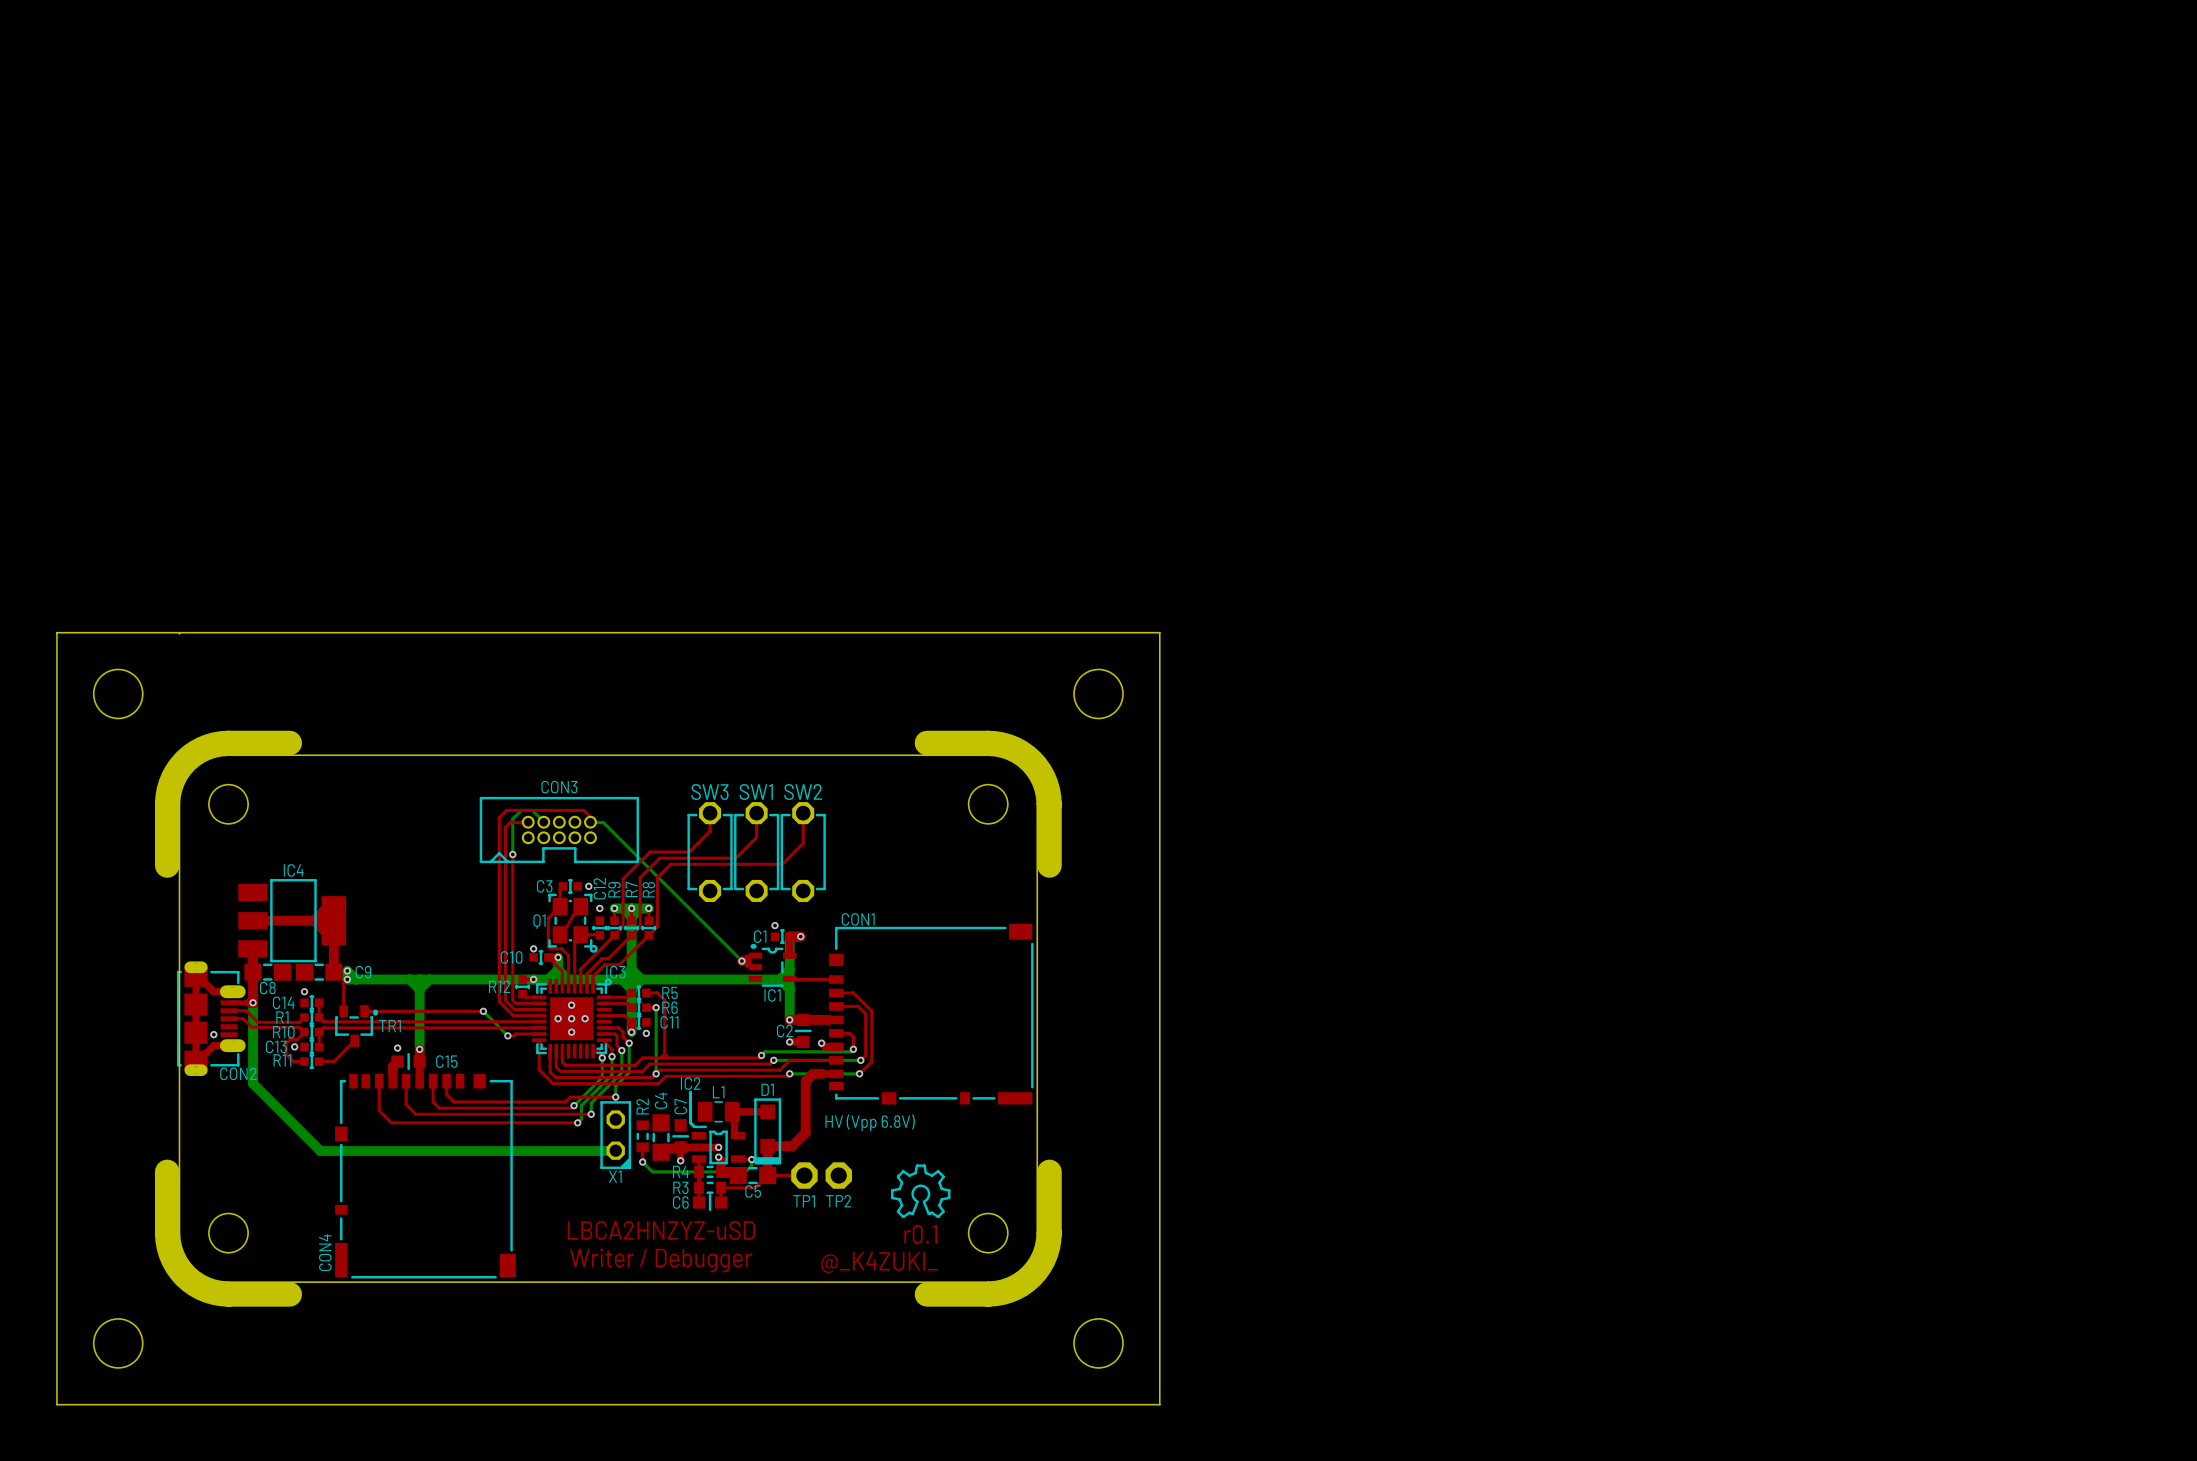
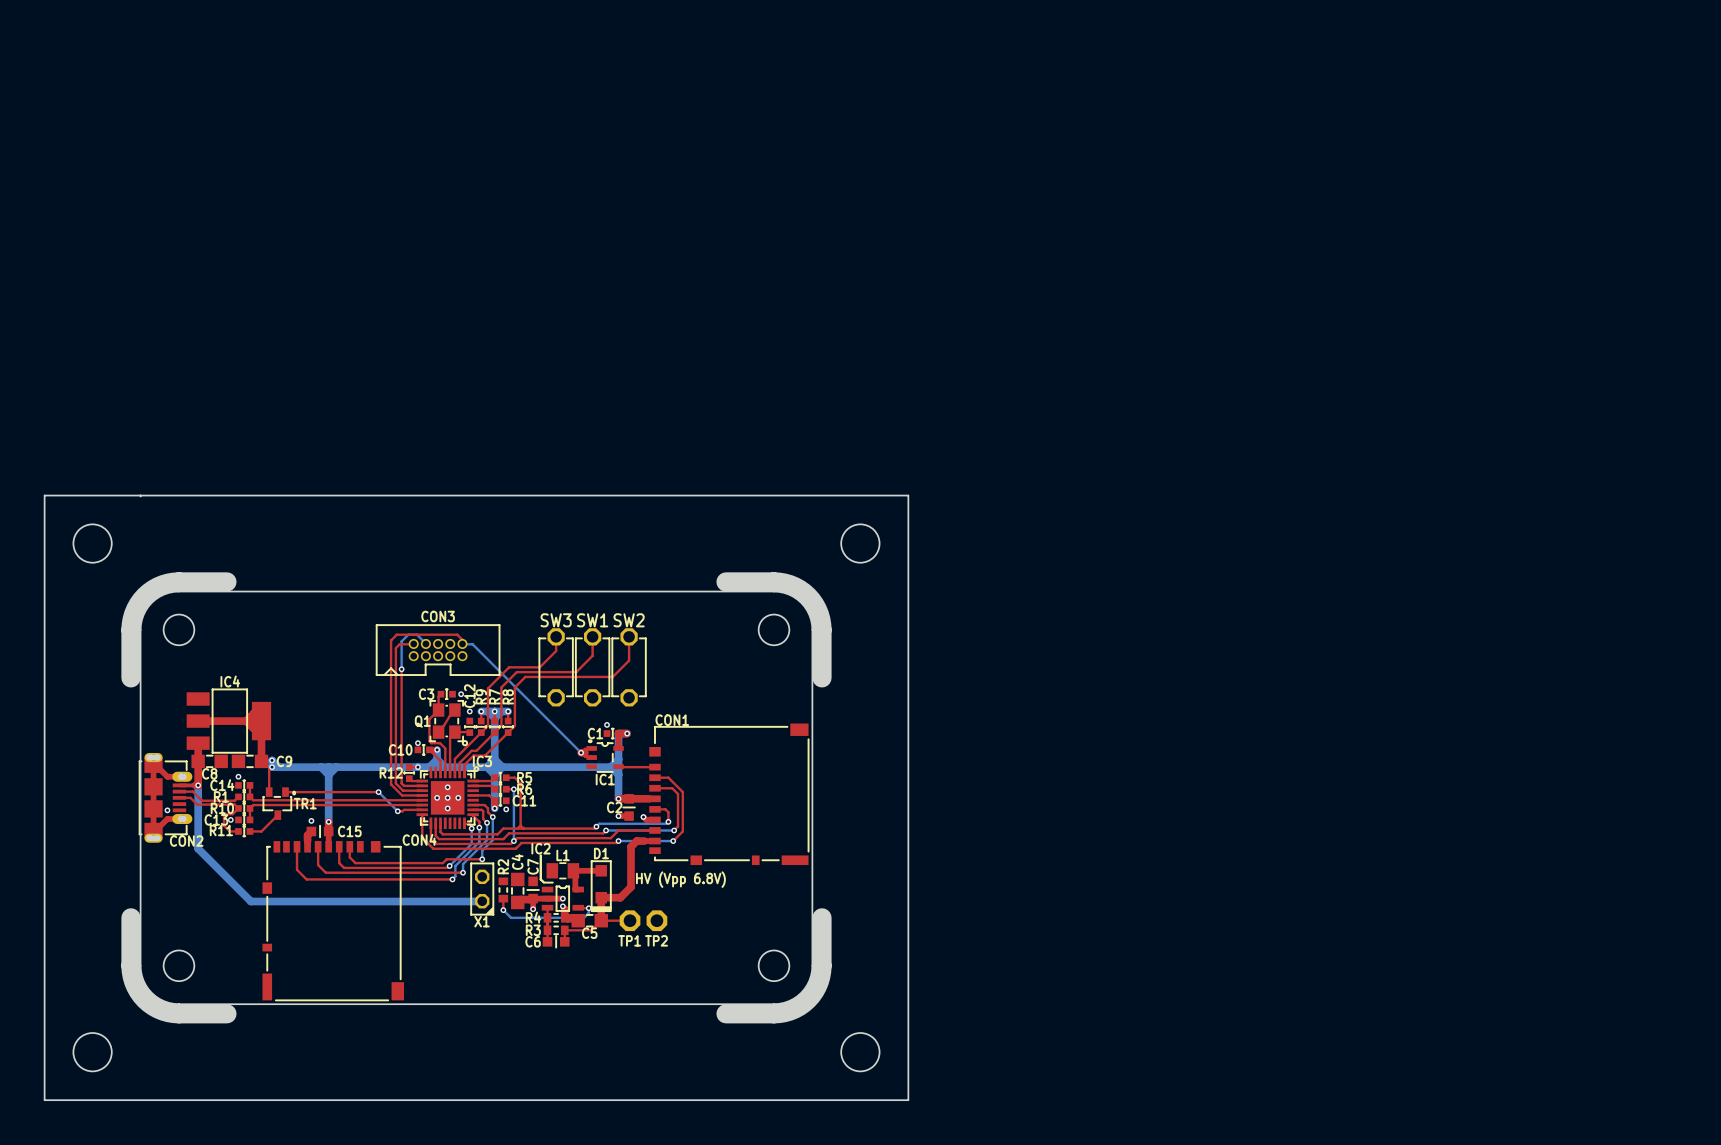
drawing: [891, 1164, 951, 1219] -> none
text: LBCA2HNZYZ-uSD (661, 1230) -> none
text: r0.1 (920, 1234) -> none
CON4 name rotation: 0° (325, 1252) -> 90° clockwise (419, 839)
CON4 name position: CON4 (325, 1252) -> CON4 (419, 839)
text: Writer / Debugger (661, 1260) -> none
text: @_K4ZUKI_ (879, 1262) -> none

